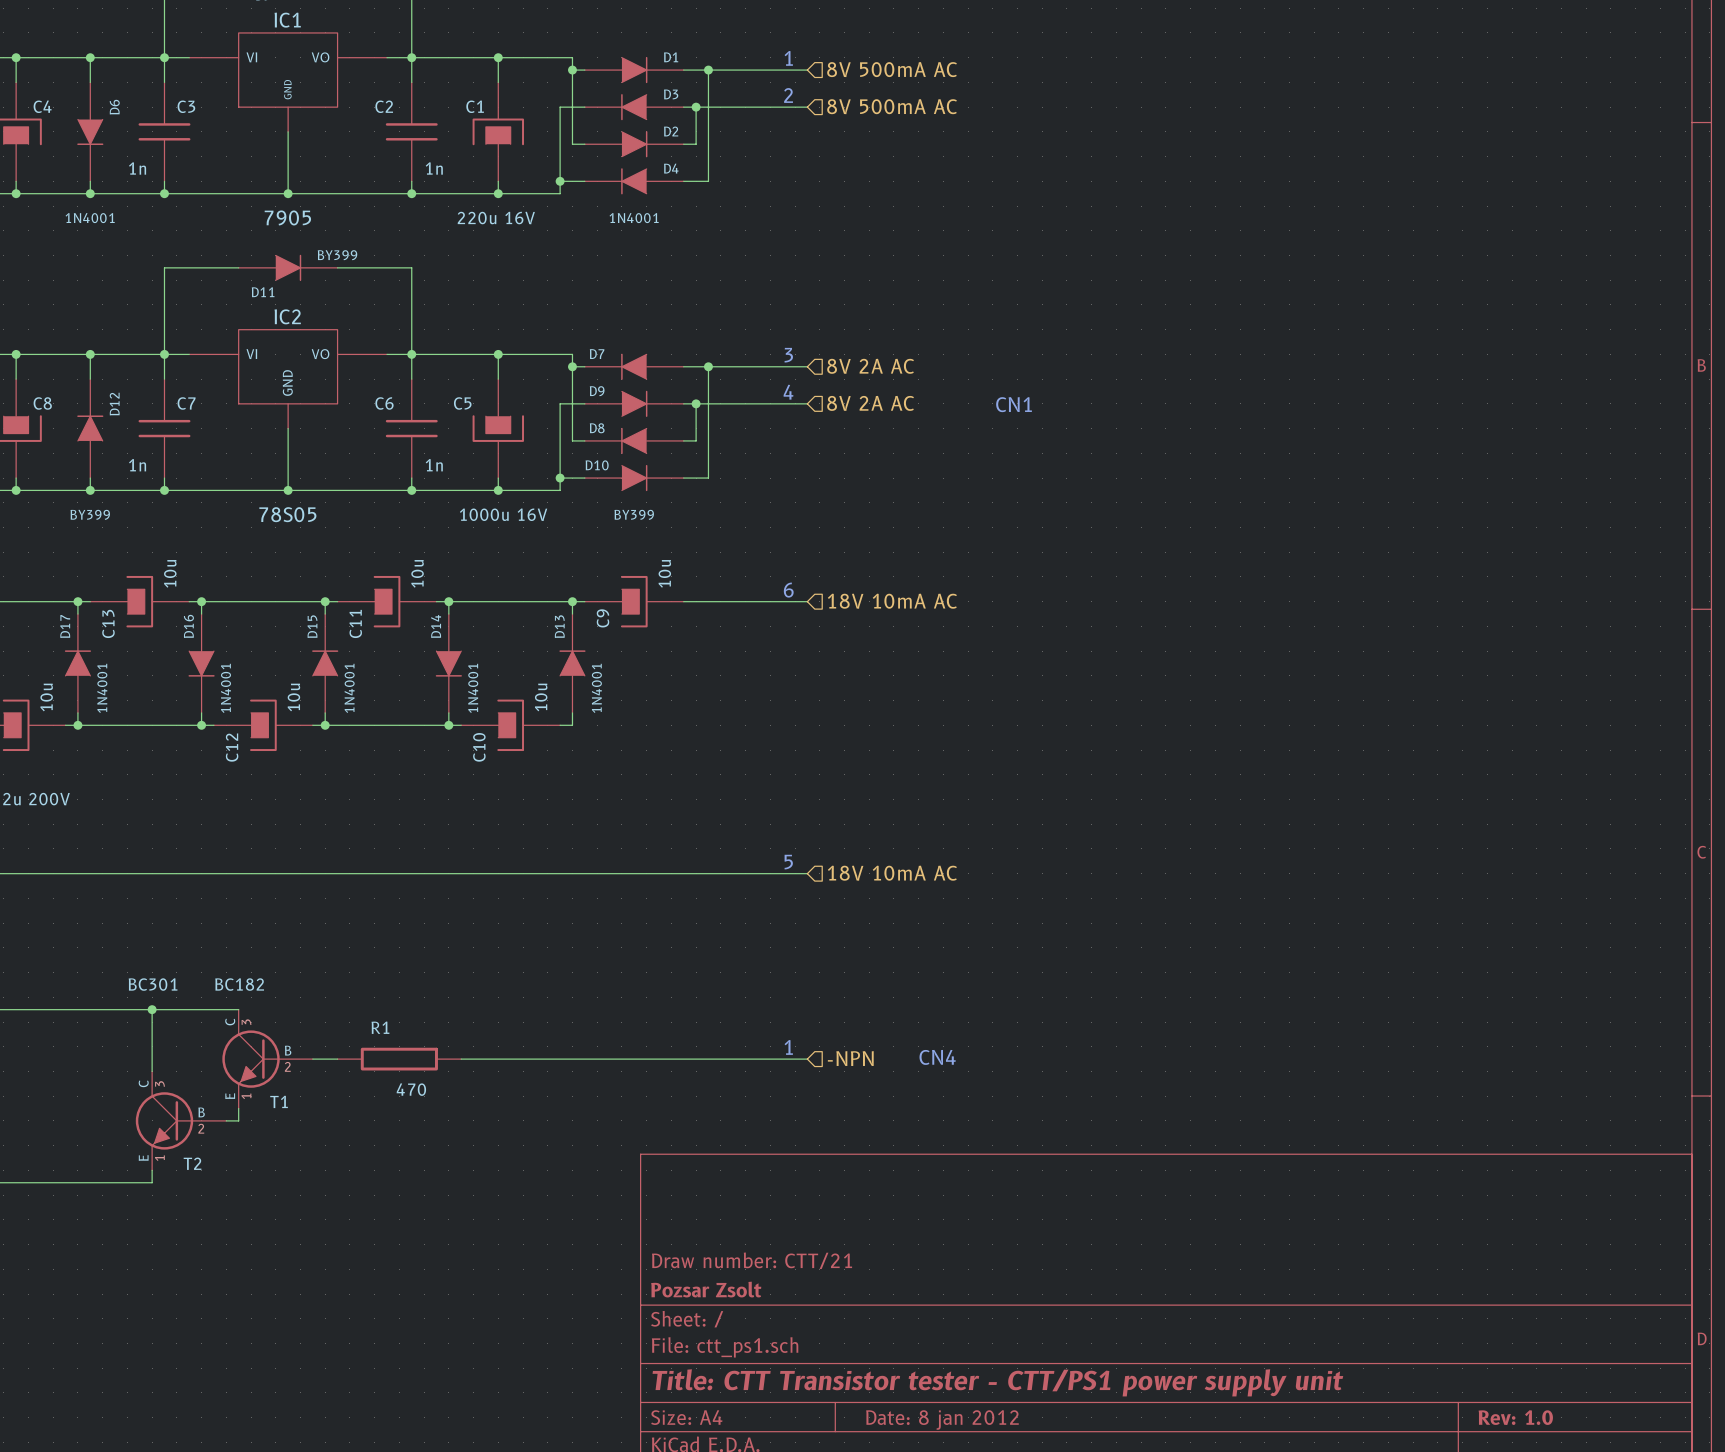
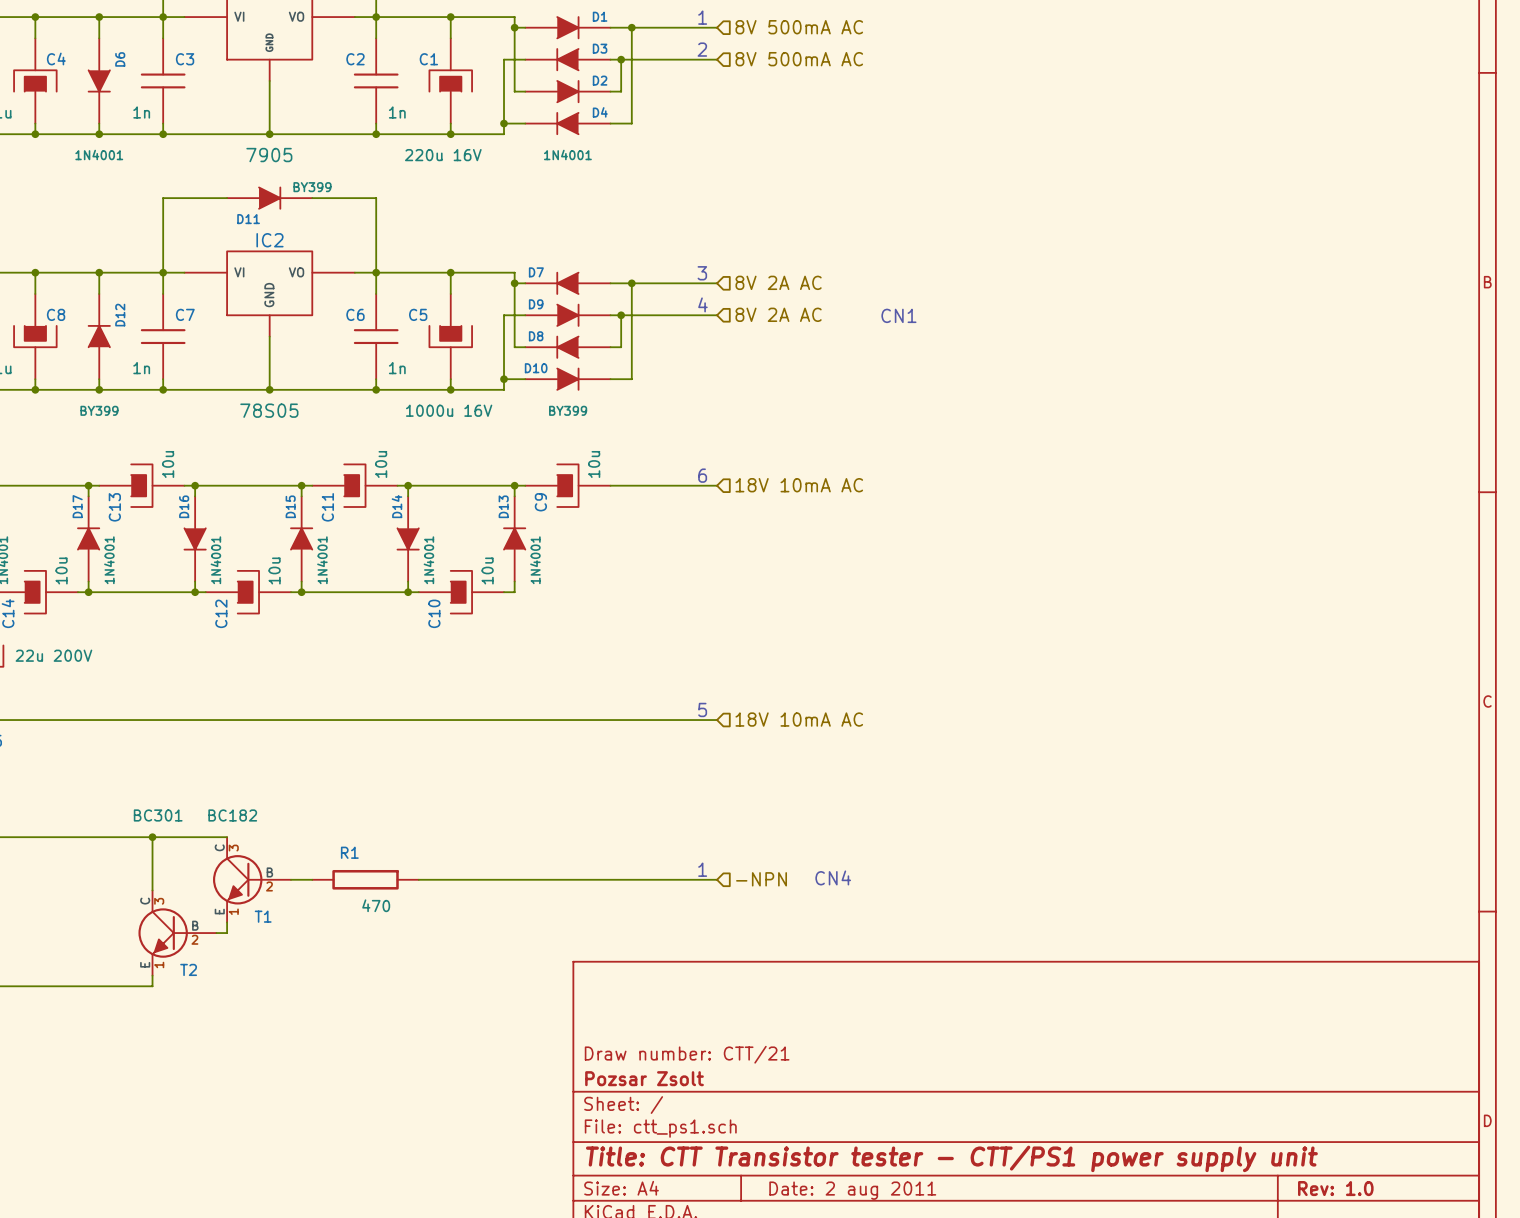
title block: Date: 8 jan 2012 (942, 1419) -> Date: 2 aug 2011 (852, 1190)

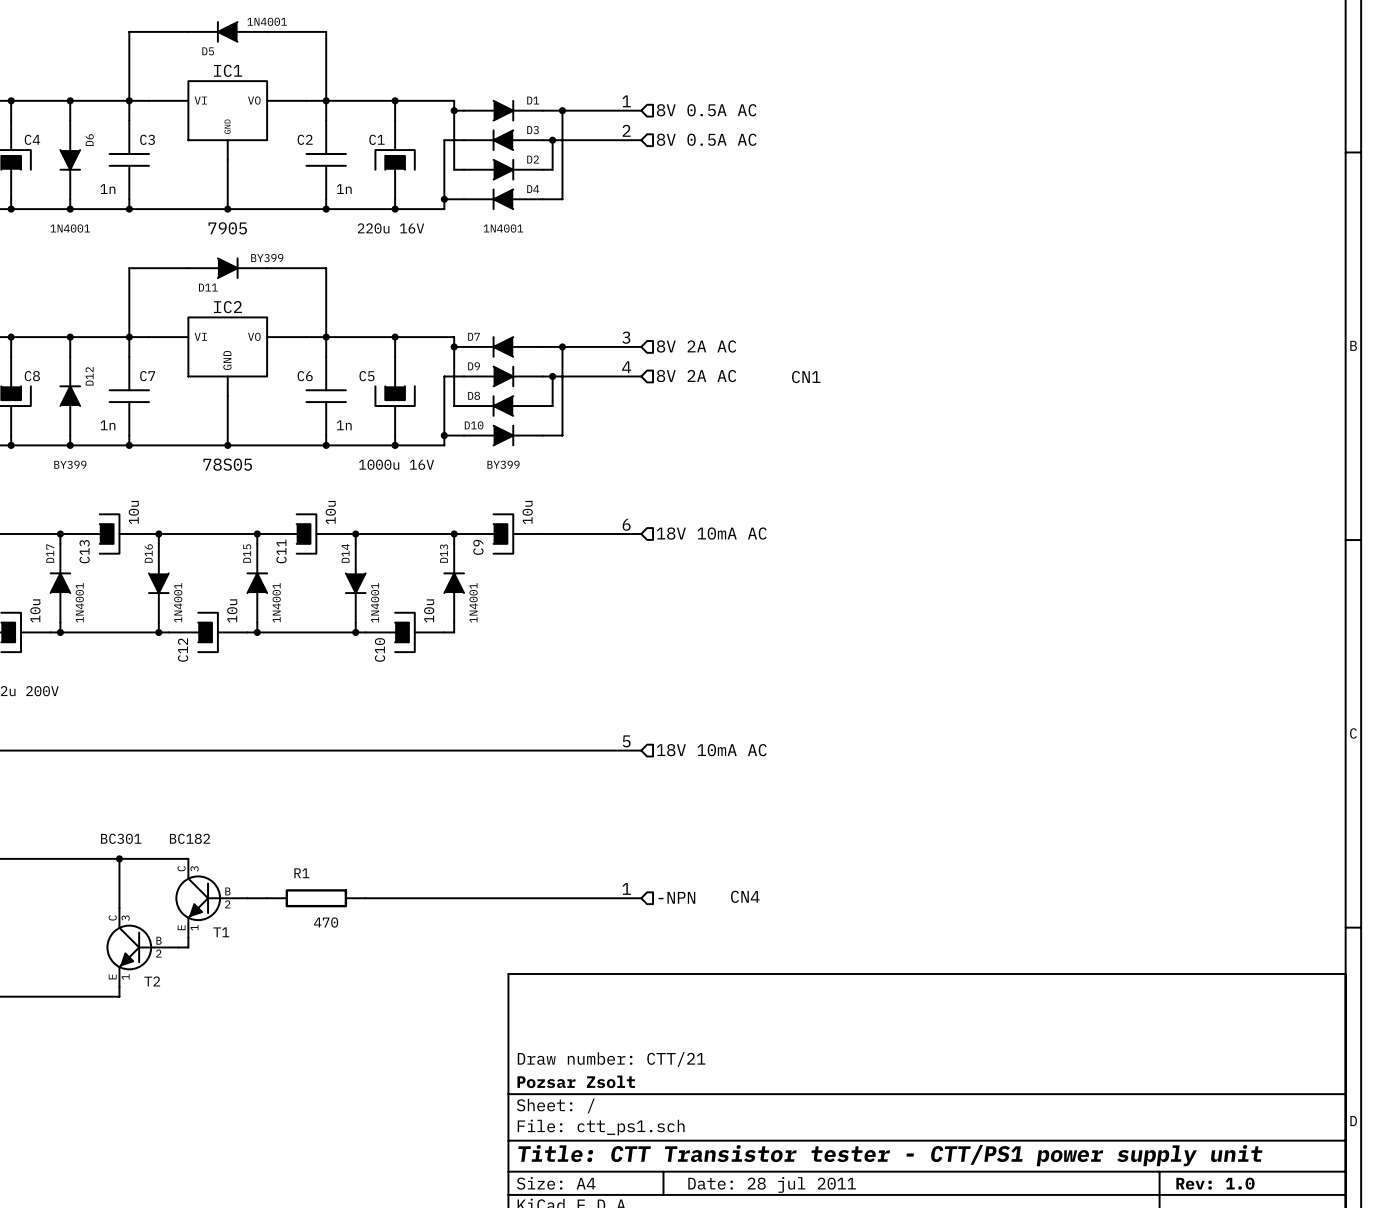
hierarchical label: 8V 500mA AC (799, 27) -> 8V 0.5A AC (706, 110)
hierarchical label: 8V 500mA AC (799, 59) -> 8V 0.5A AC (706, 139)
title block: Date: 2 aug 2011 (852, 1190) -> Date: 28 jul 2011 (772, 1184)

